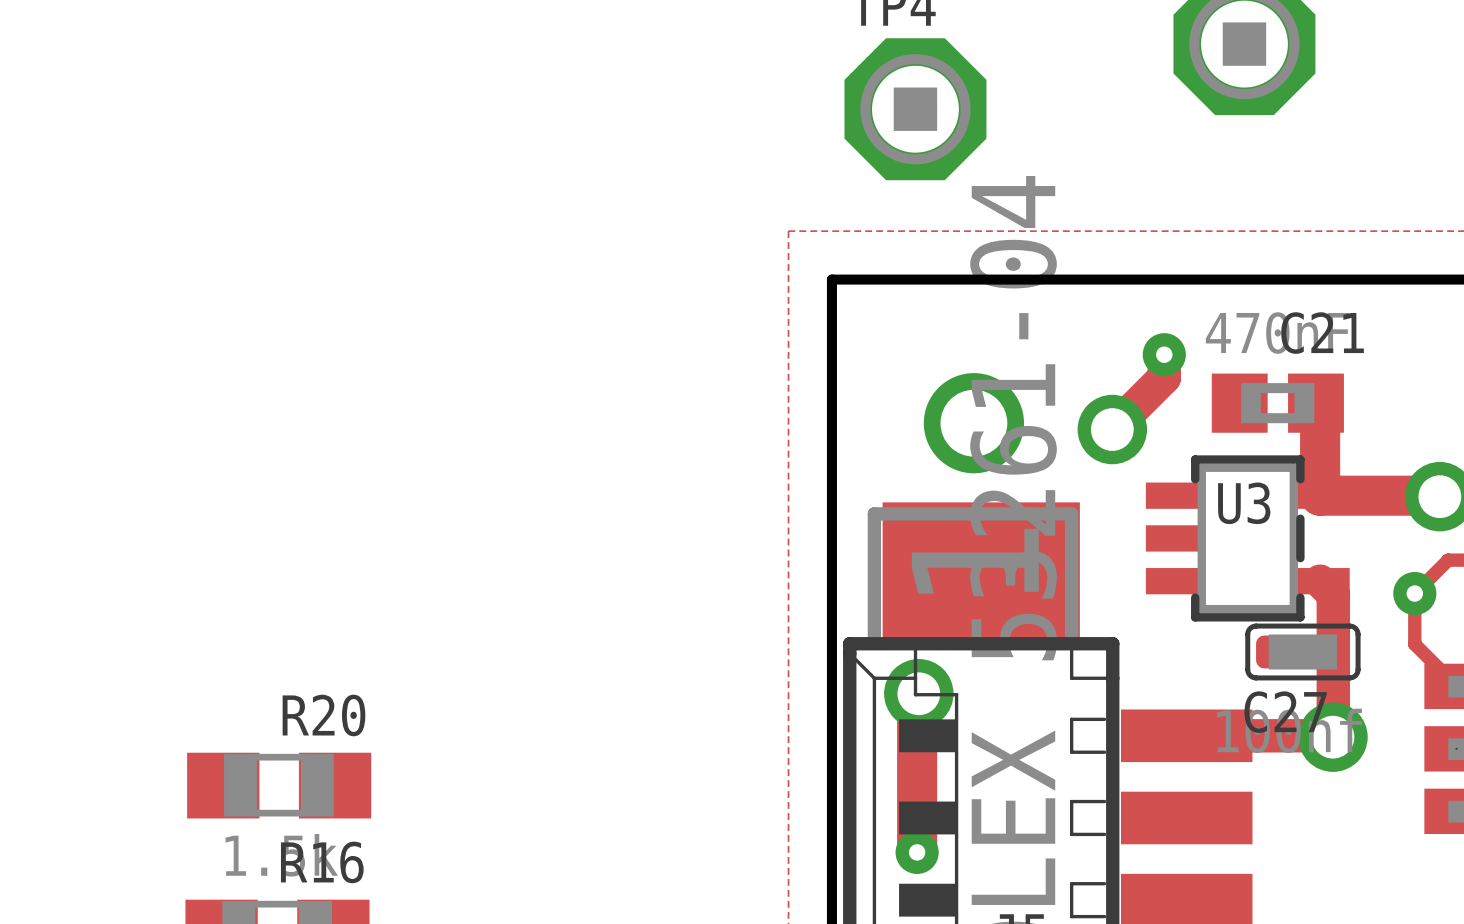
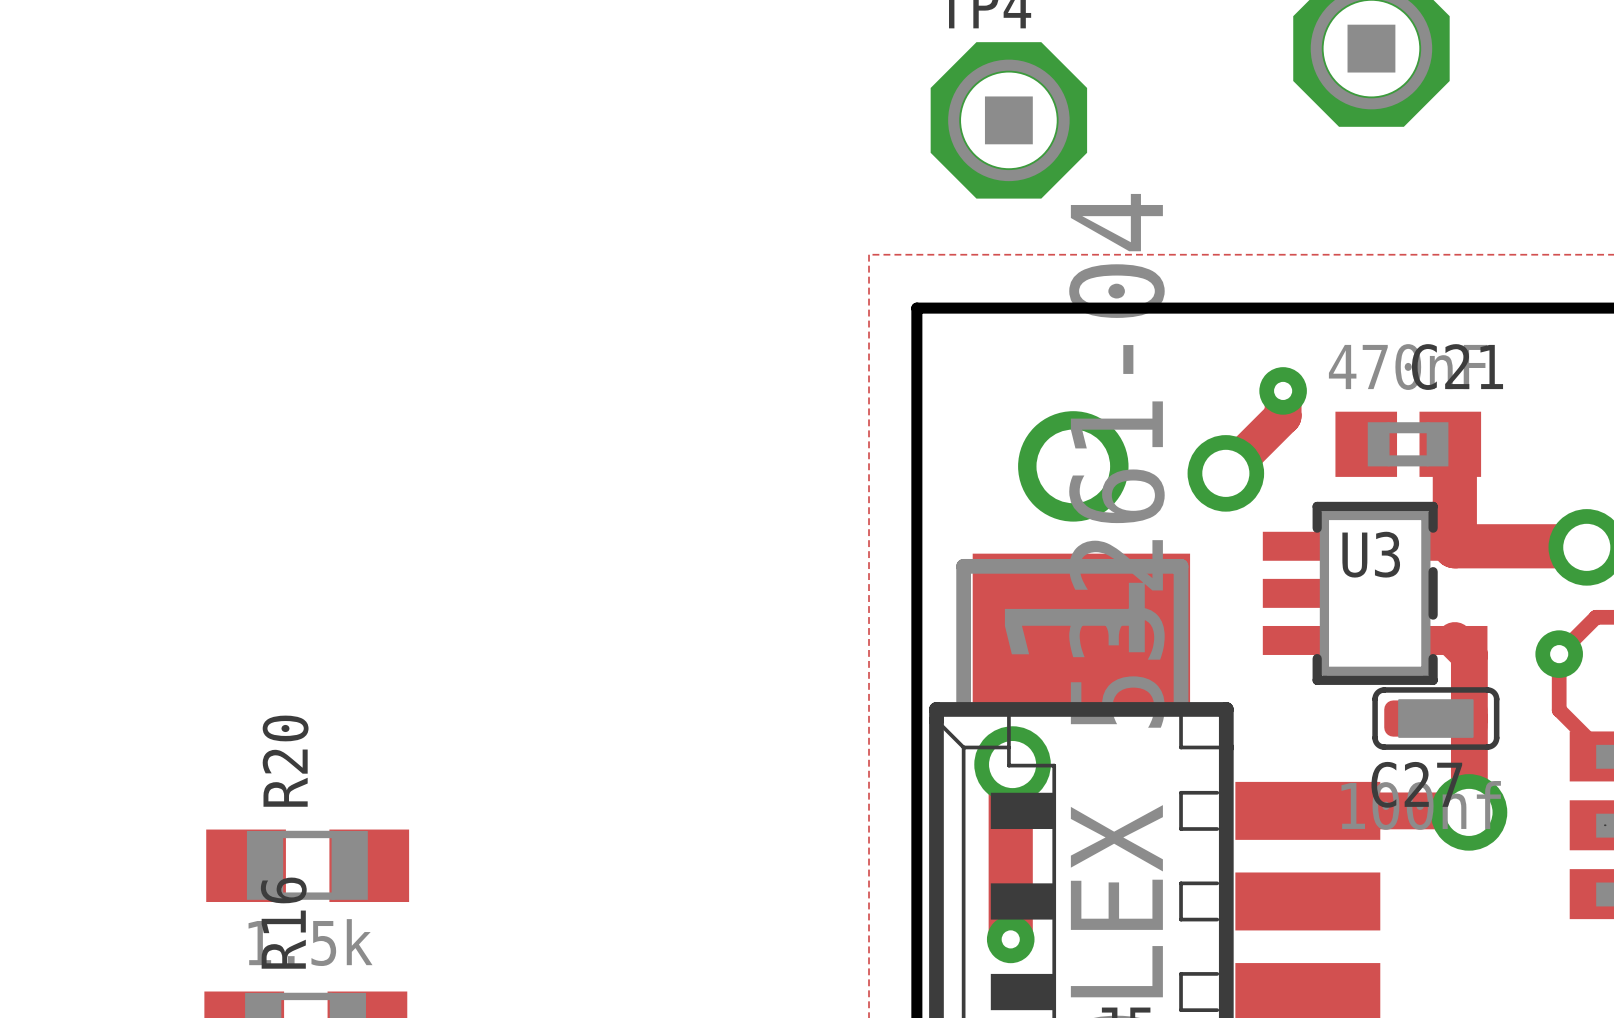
R20 name rotation: 0° (323, 715) -> 90° counterclockwise (285, 761)
R16 name rotation: 0° (322, 862) -> 90° counterclockwise (283, 923)

